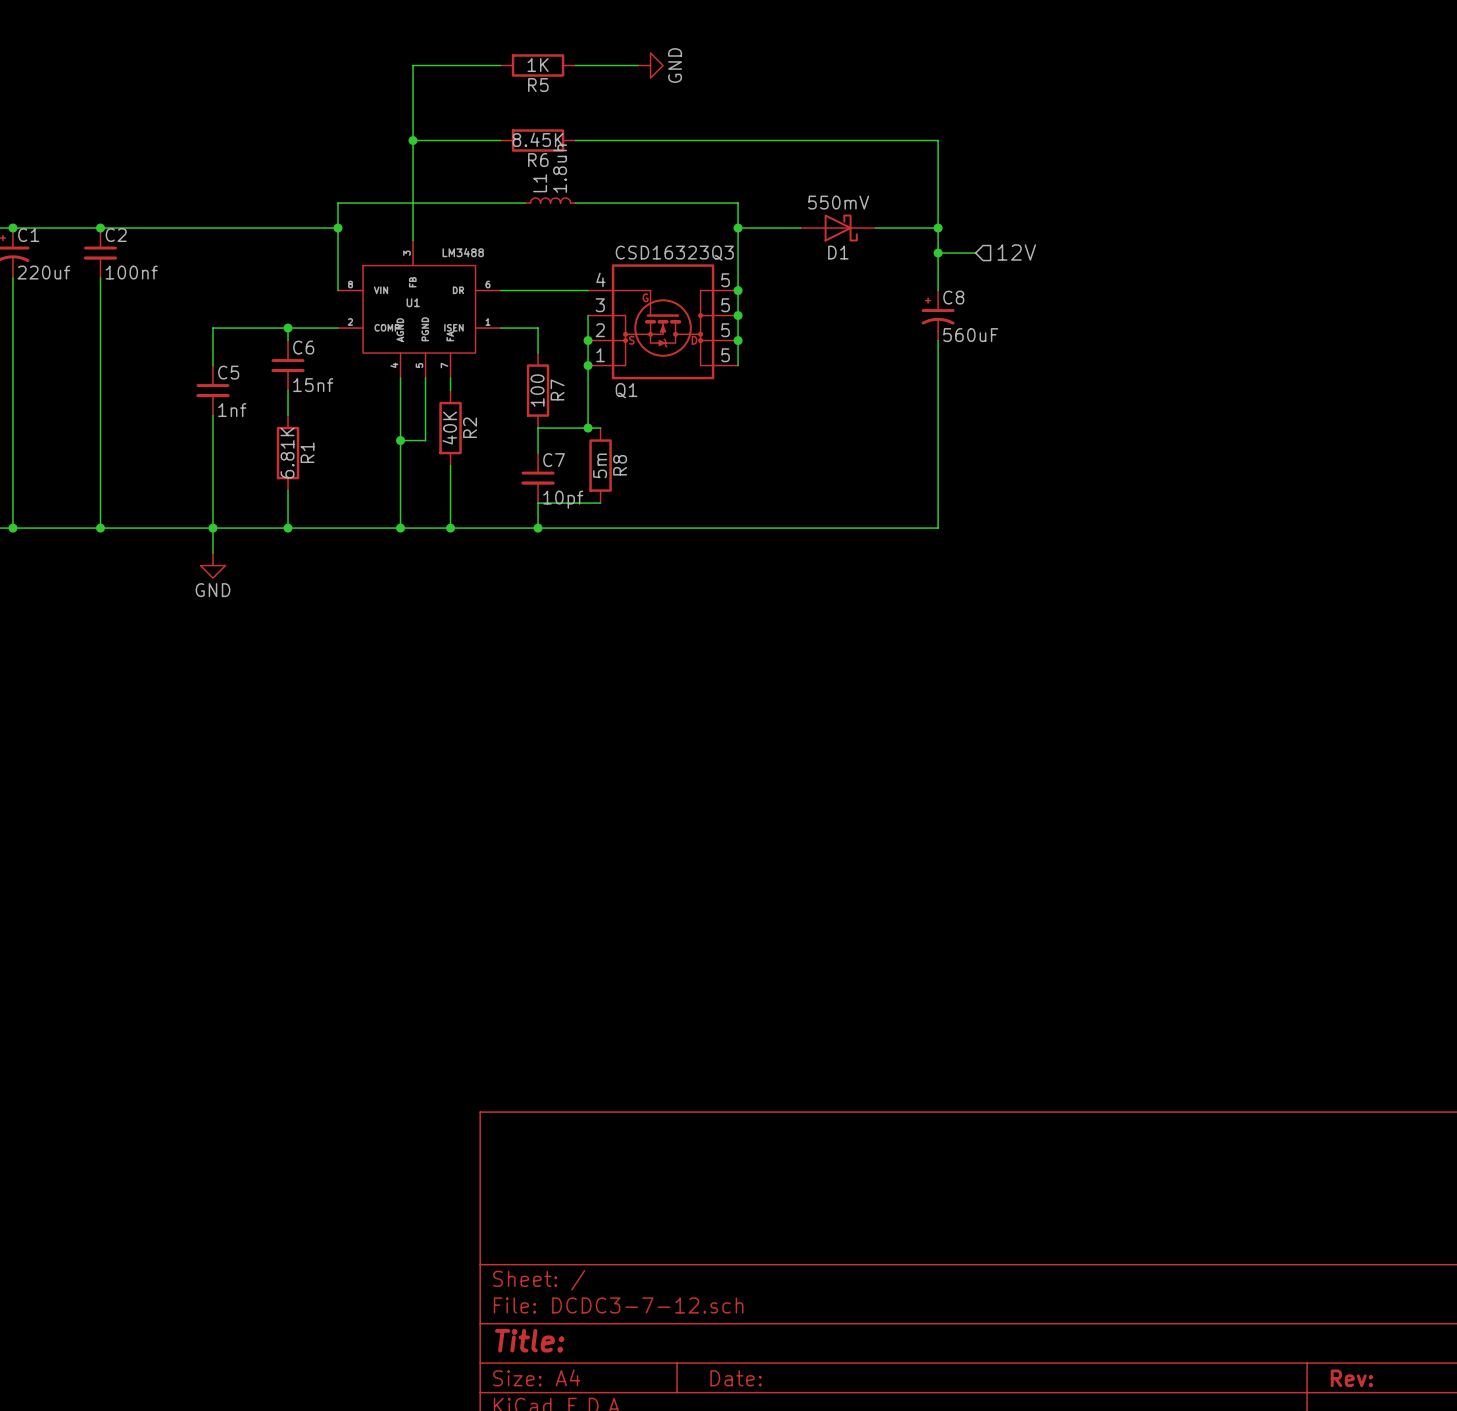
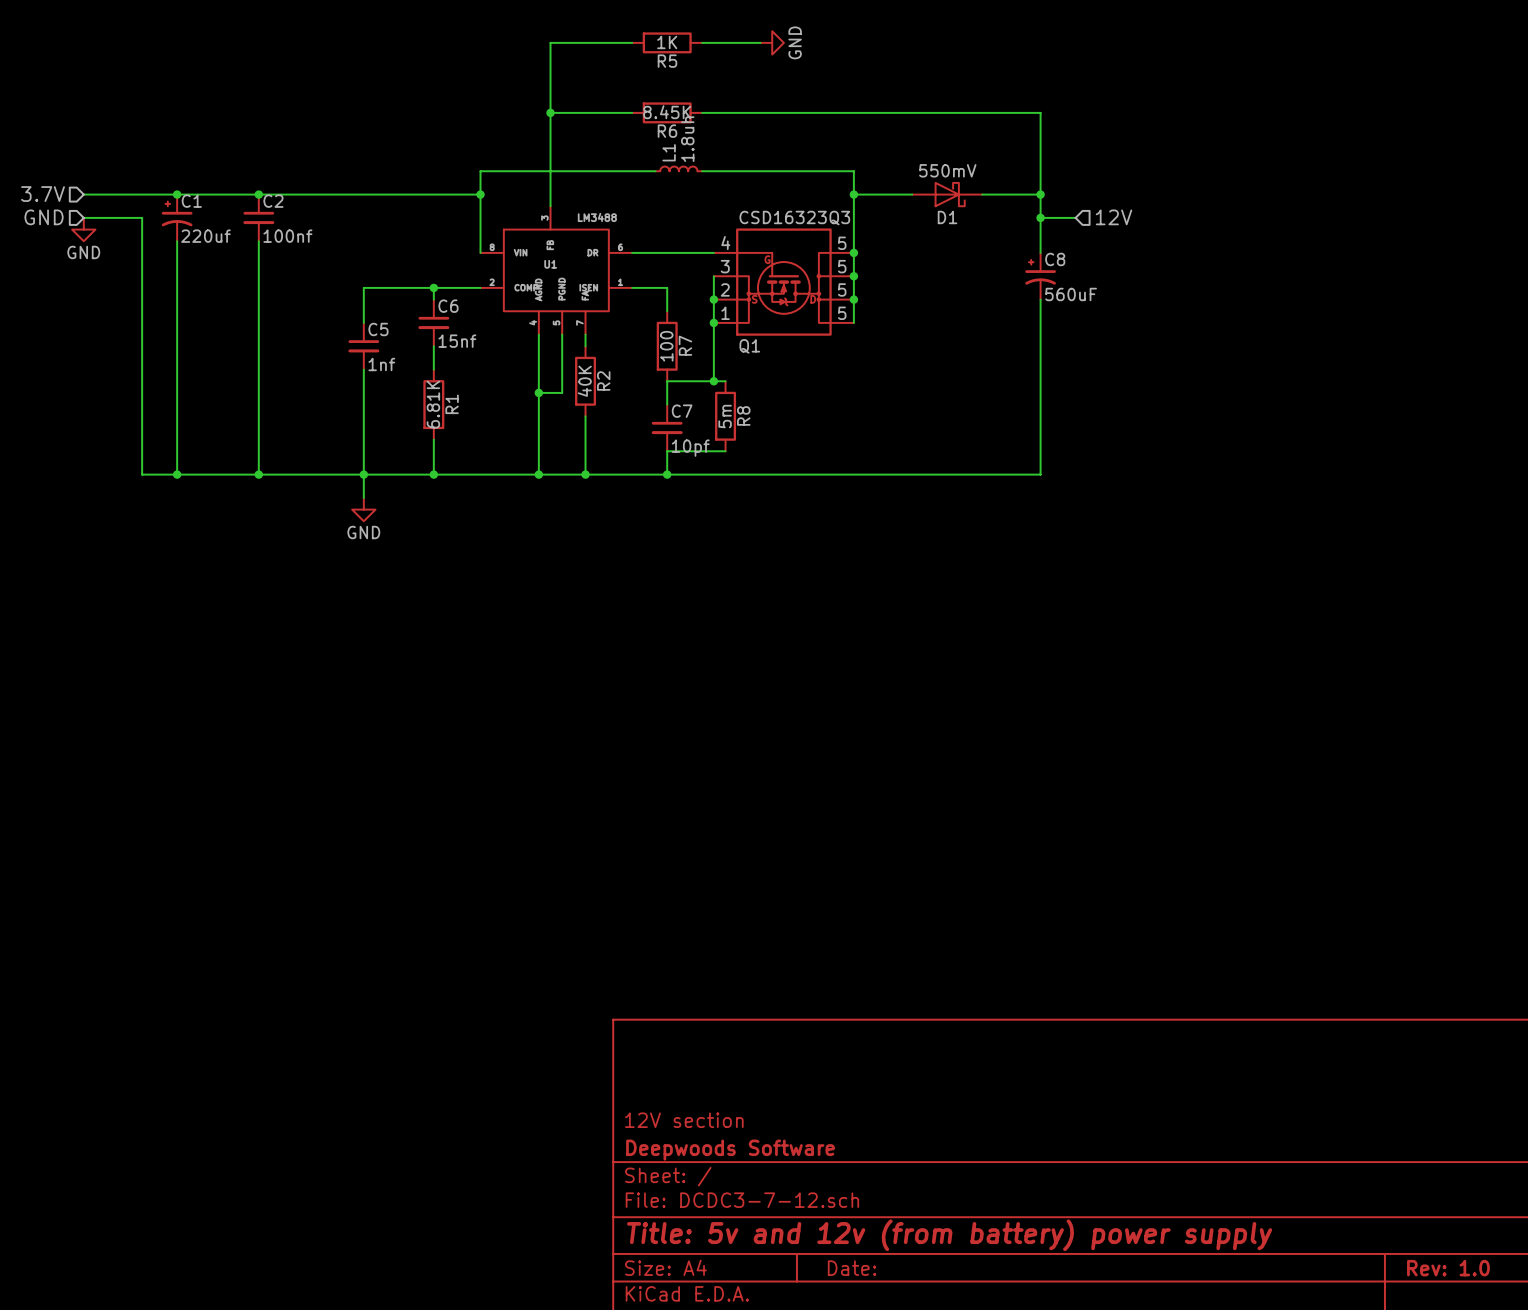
title block: none -> 12V section (684, 1120)
title block: none -> Deepwoods Software (730, 1150)
title block: Title: (529, 1340) -> Title: 5v and 12v (from battery) power supply (949, 1235)
title block: Rev: (1351, 1378) -> Rev: 1.0 (1448, 1268)

